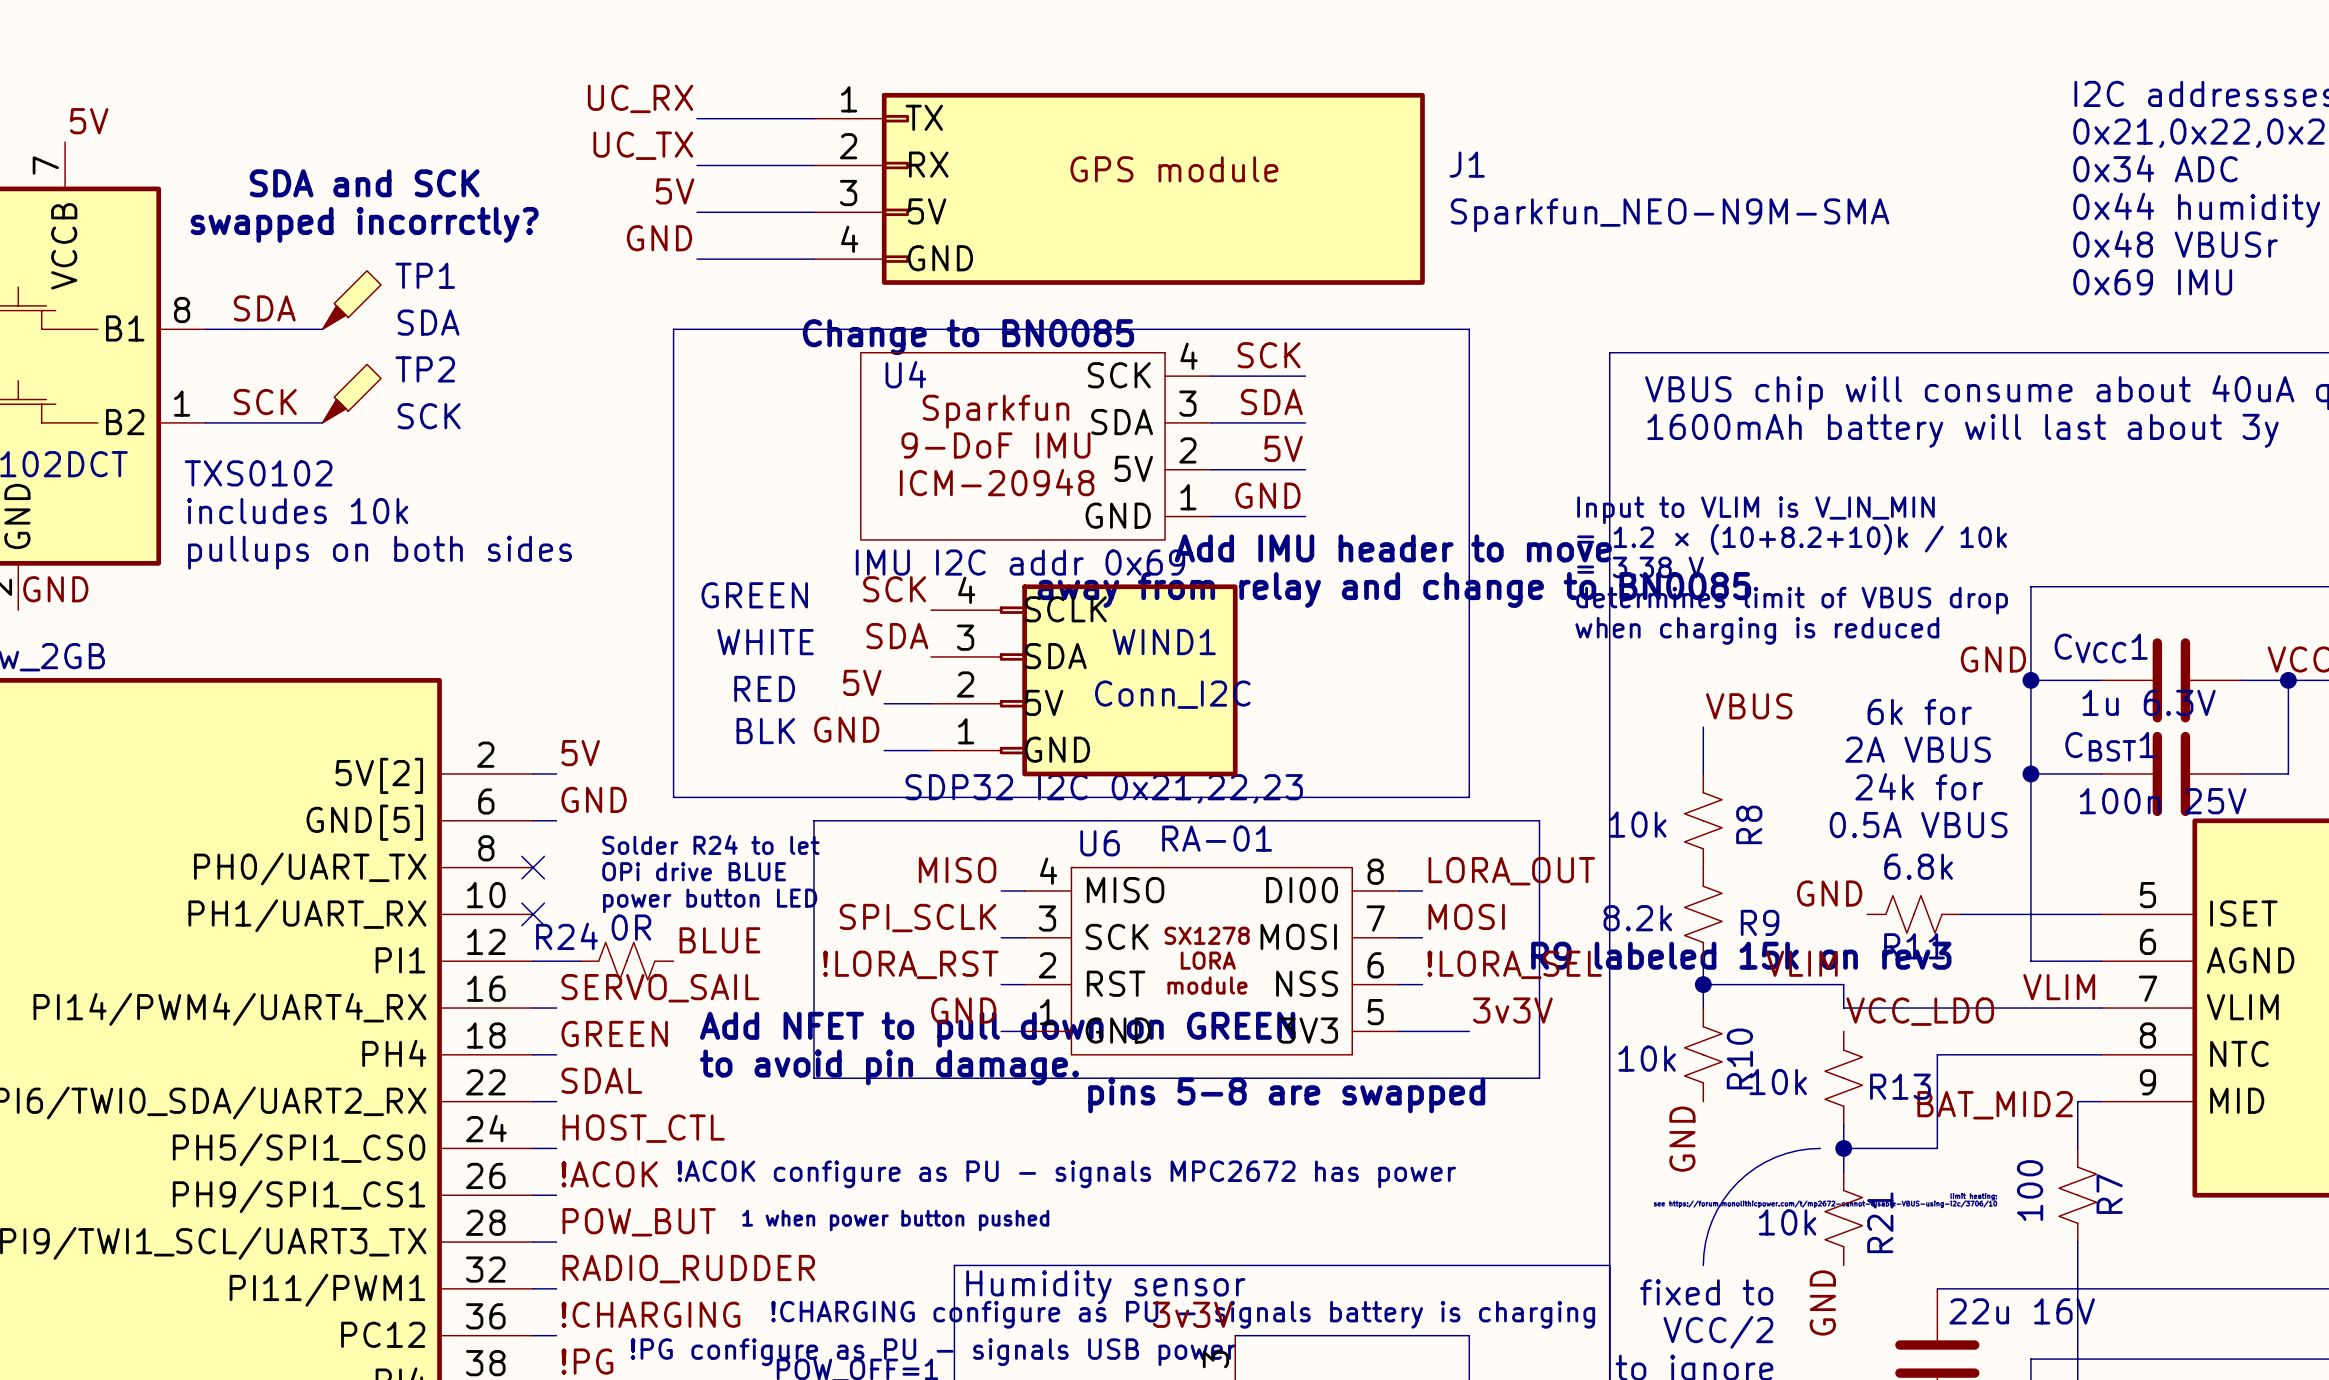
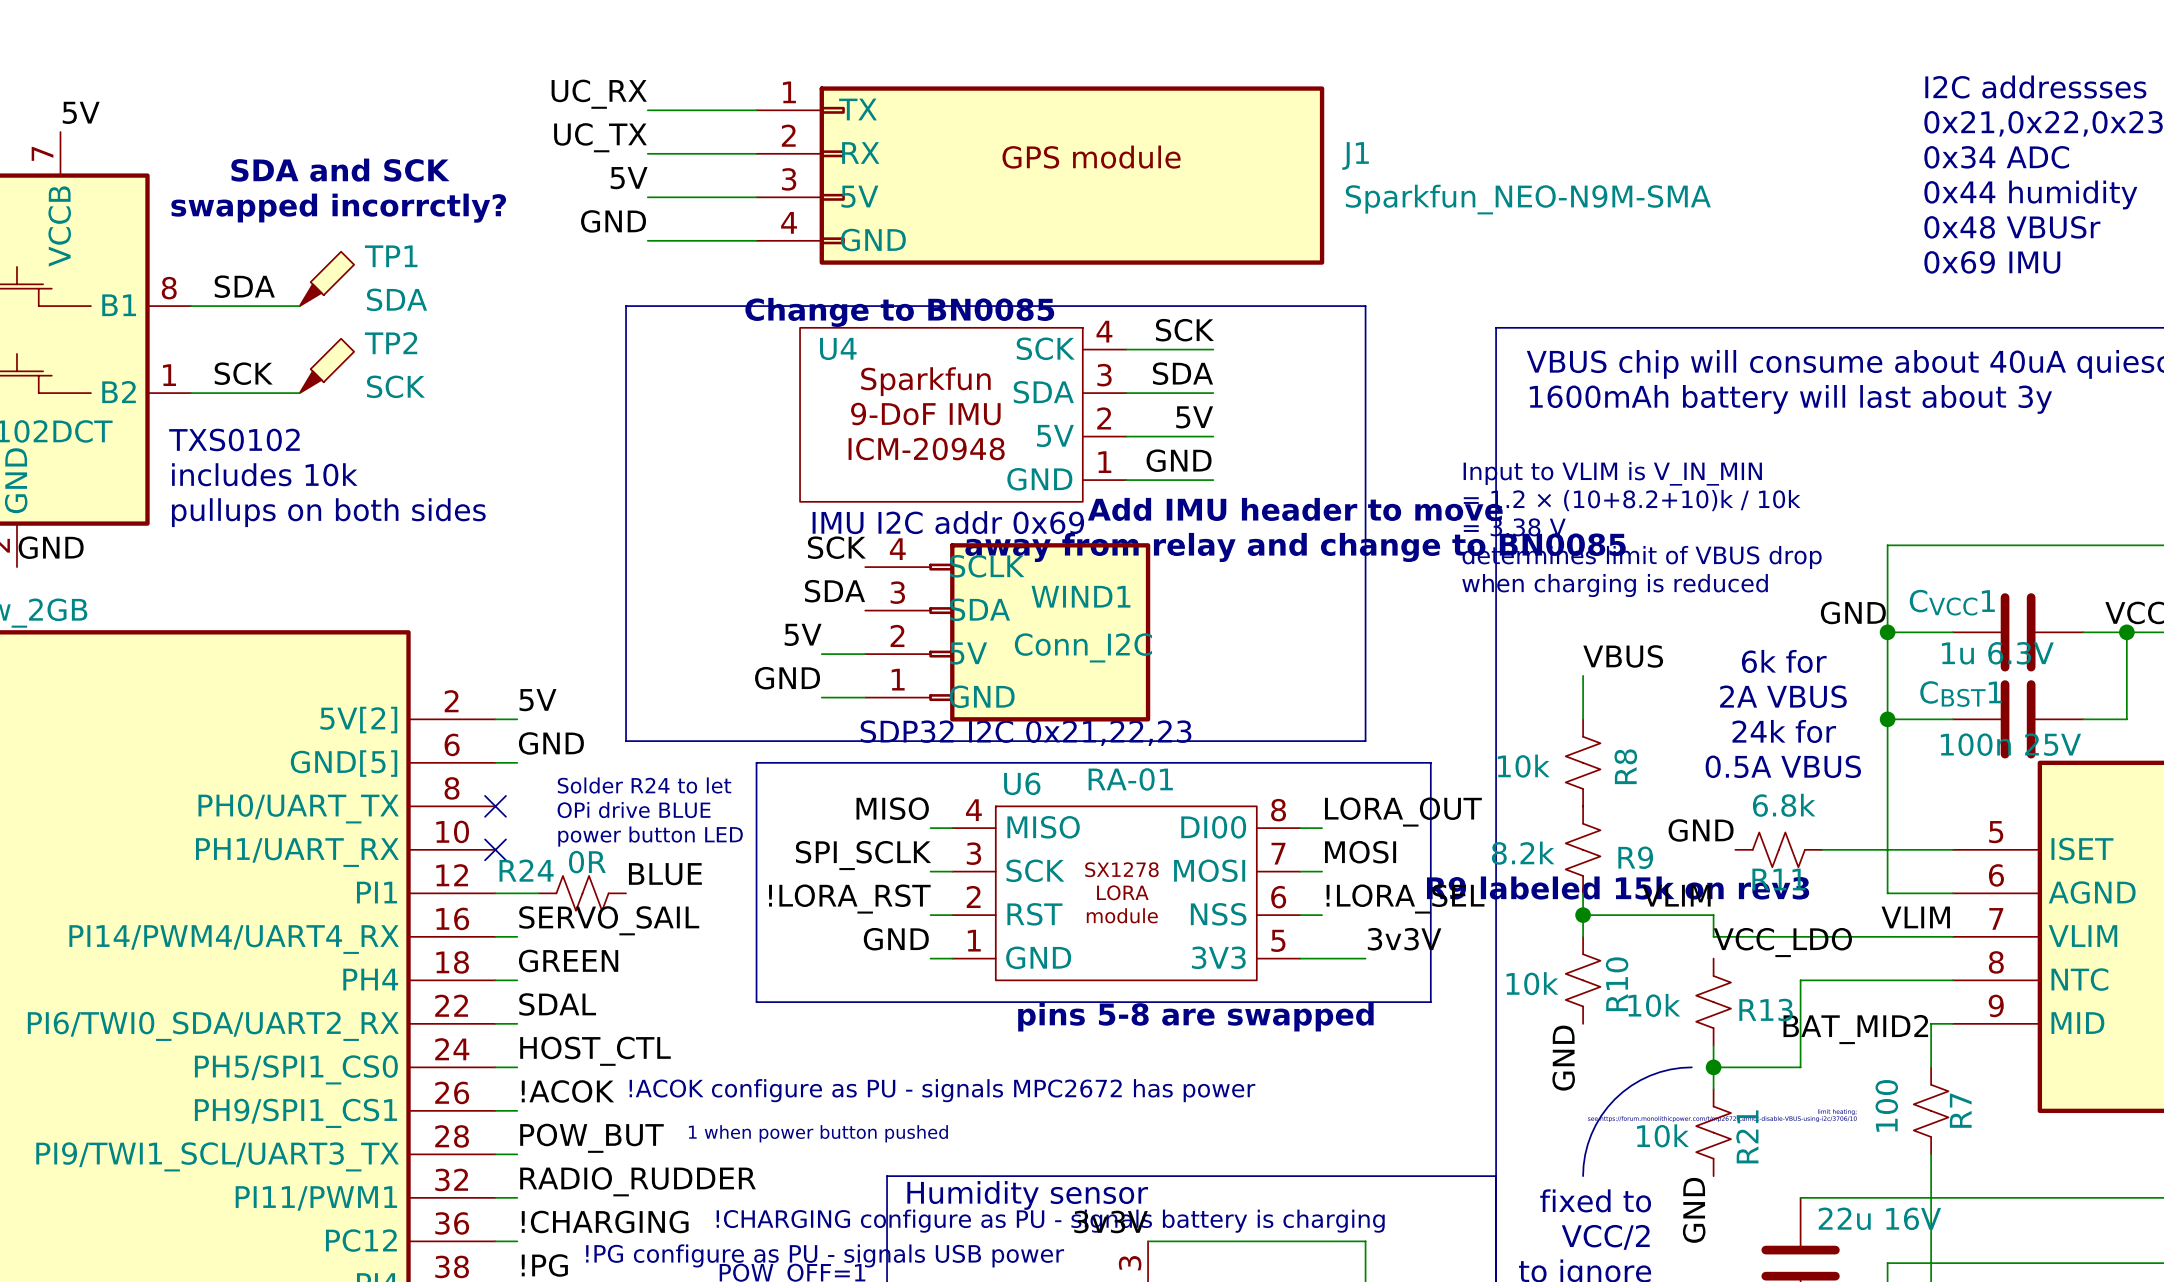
text: GREEN (754, 595) -> none
text: WHITE (765, 642) -> none
text: RED (764, 688) -> none
text: BLK (765, 731) -> none
text: Add NFET to pull down on GREEN (997, 1029) -> none
text: to avoid pin damage. (889, 1067) -> none

